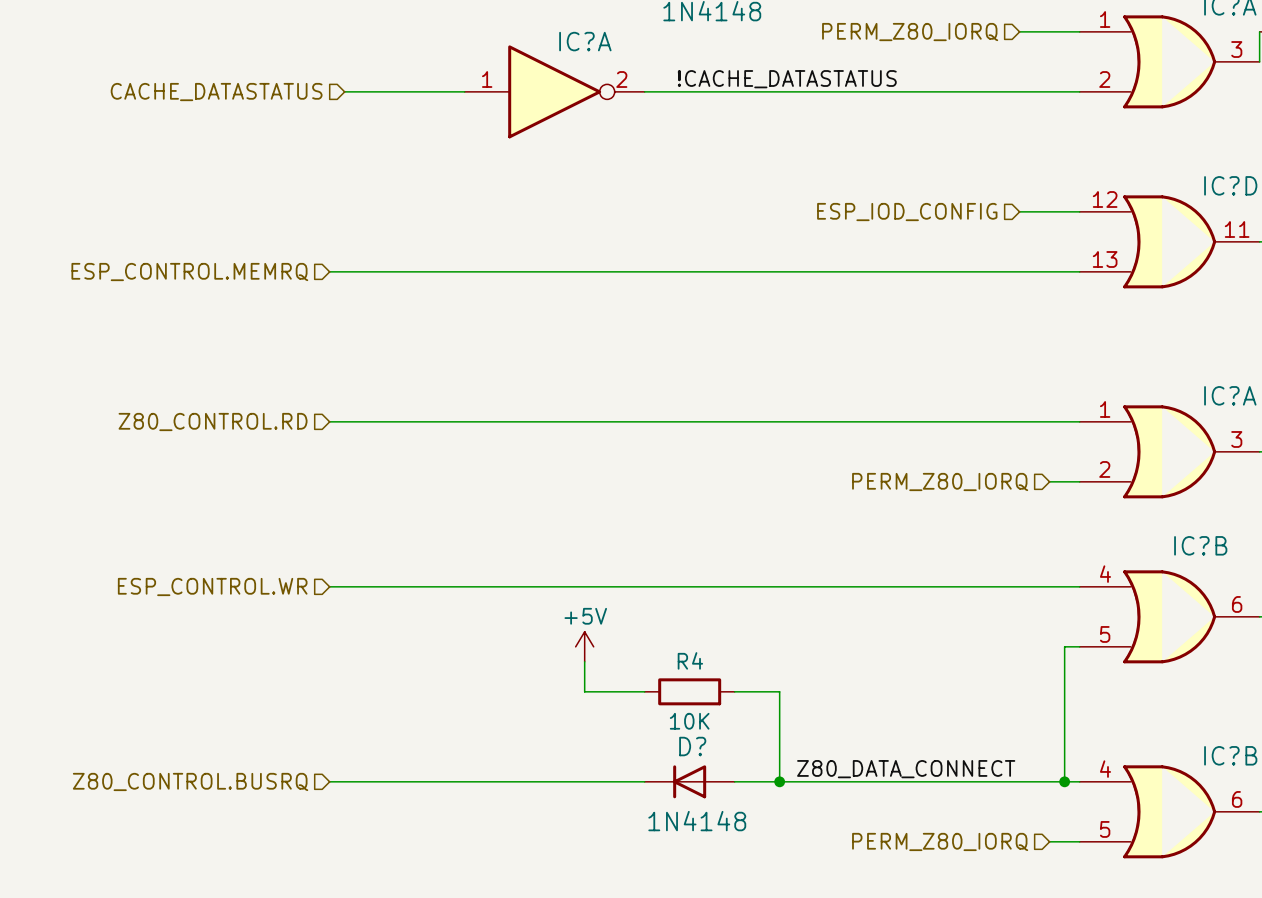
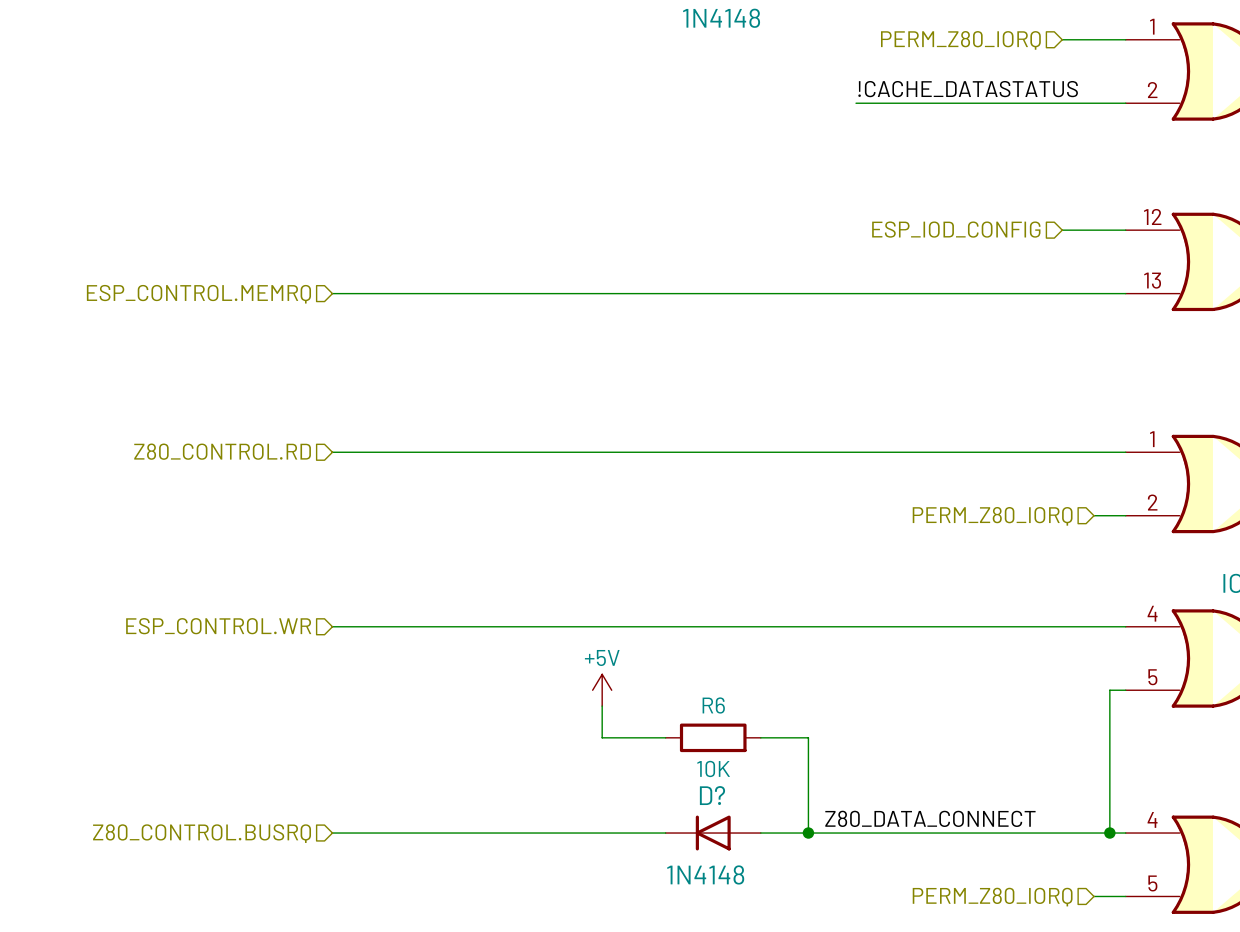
label position: !CACHE_DATASTATUS (787, 79) -> !CACHE_DATASTATUS (968, 89)
wire: (344, 91) (464, 91) -> none
IC?A: (554, 91) -> none
wire: (644, 91) (824, 91) -> none
hierarchical label: CACHE_DATASTATUS (216, 92) -> none
R4 name: R4 (690, 660) -> R6 (713, 705)

